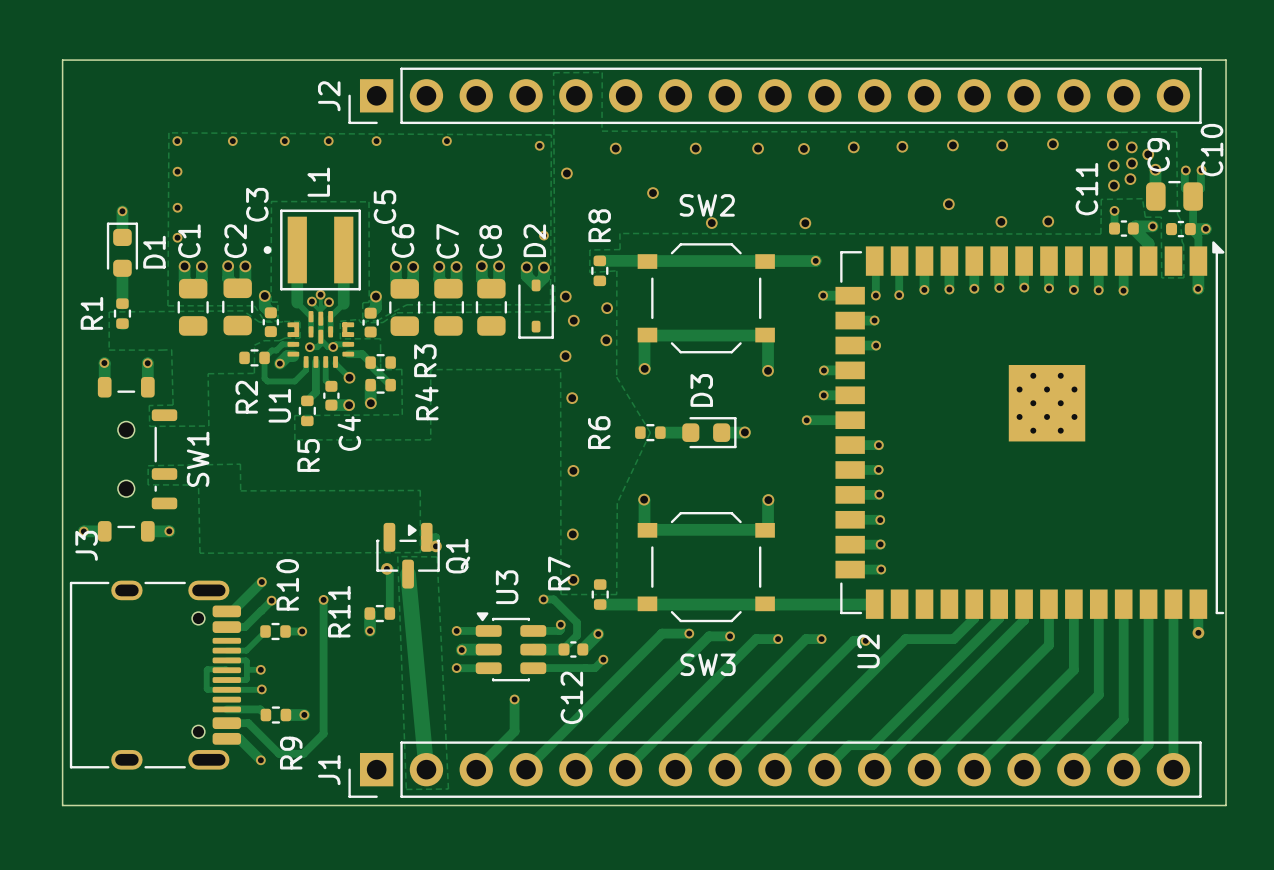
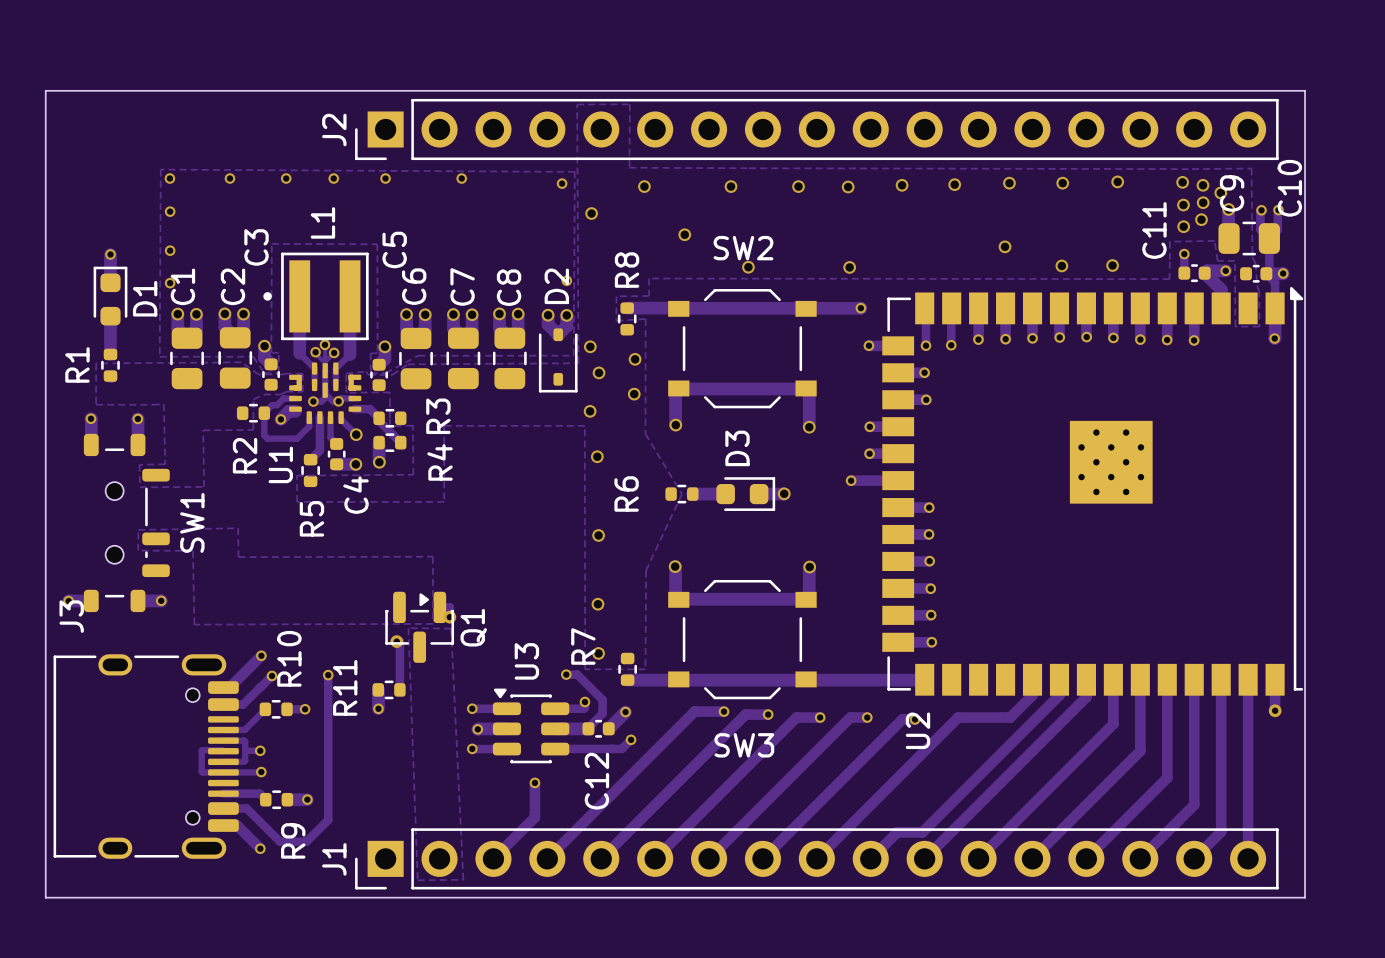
track: (408, 574) (426, 769) -> none

